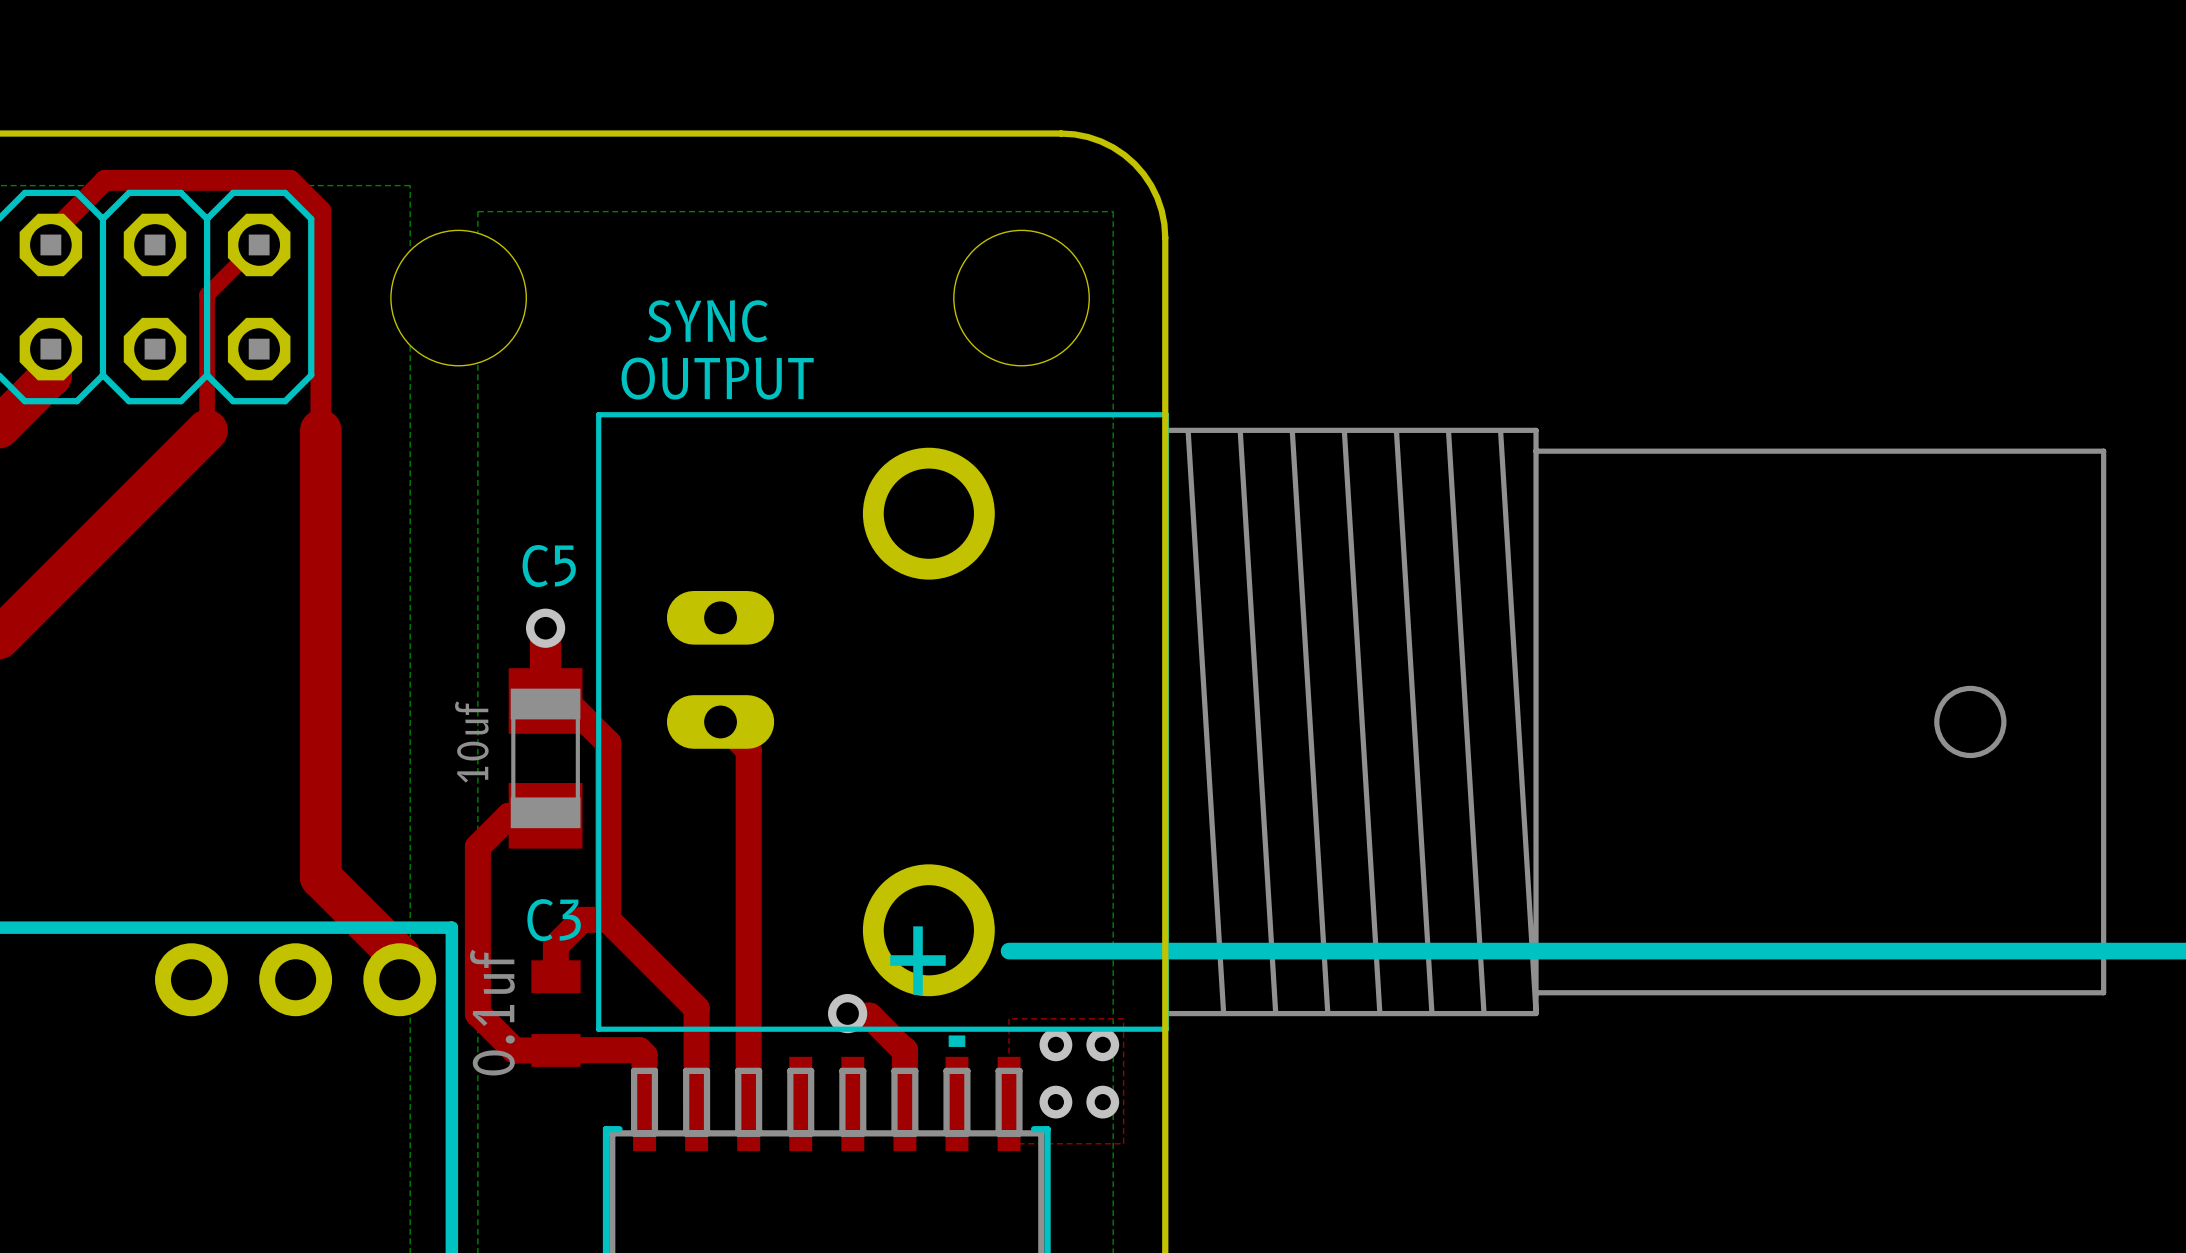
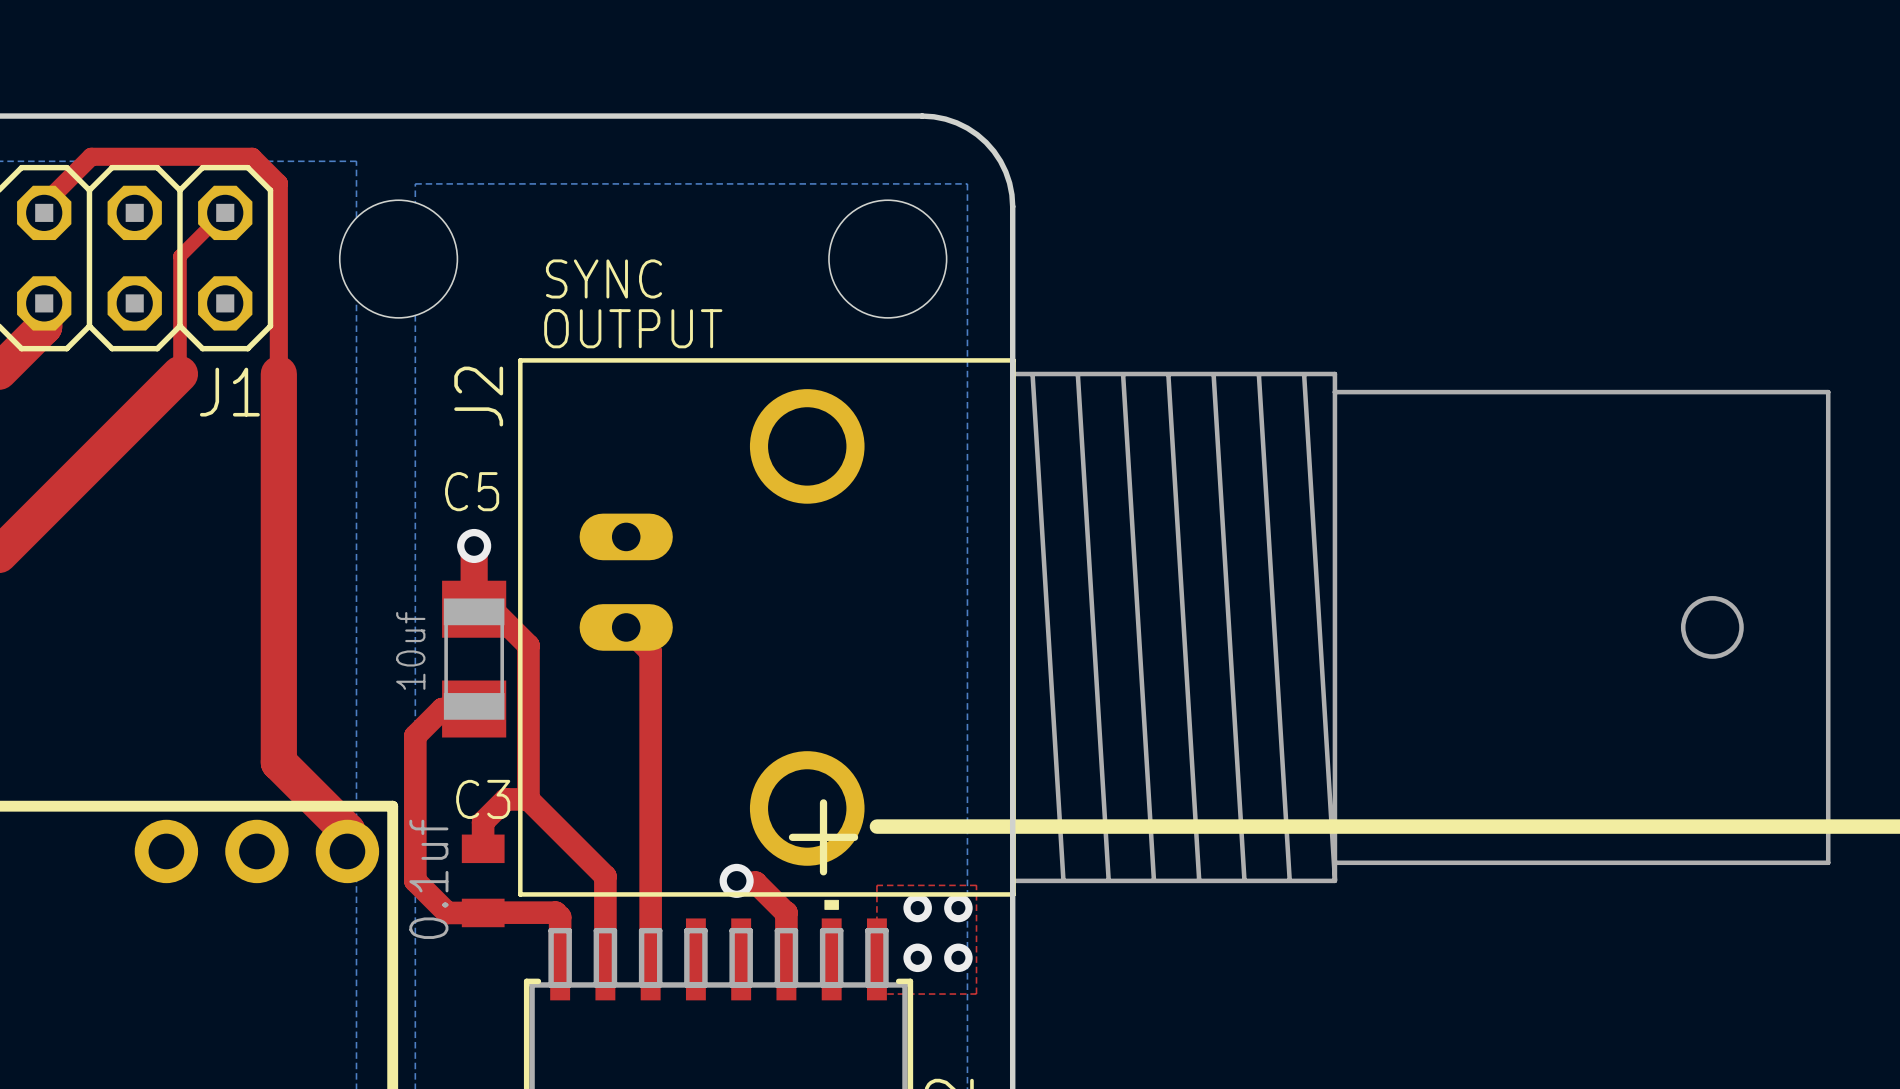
text: none -> J1 (229, 392)
text: none -> J2 (478, 396)

